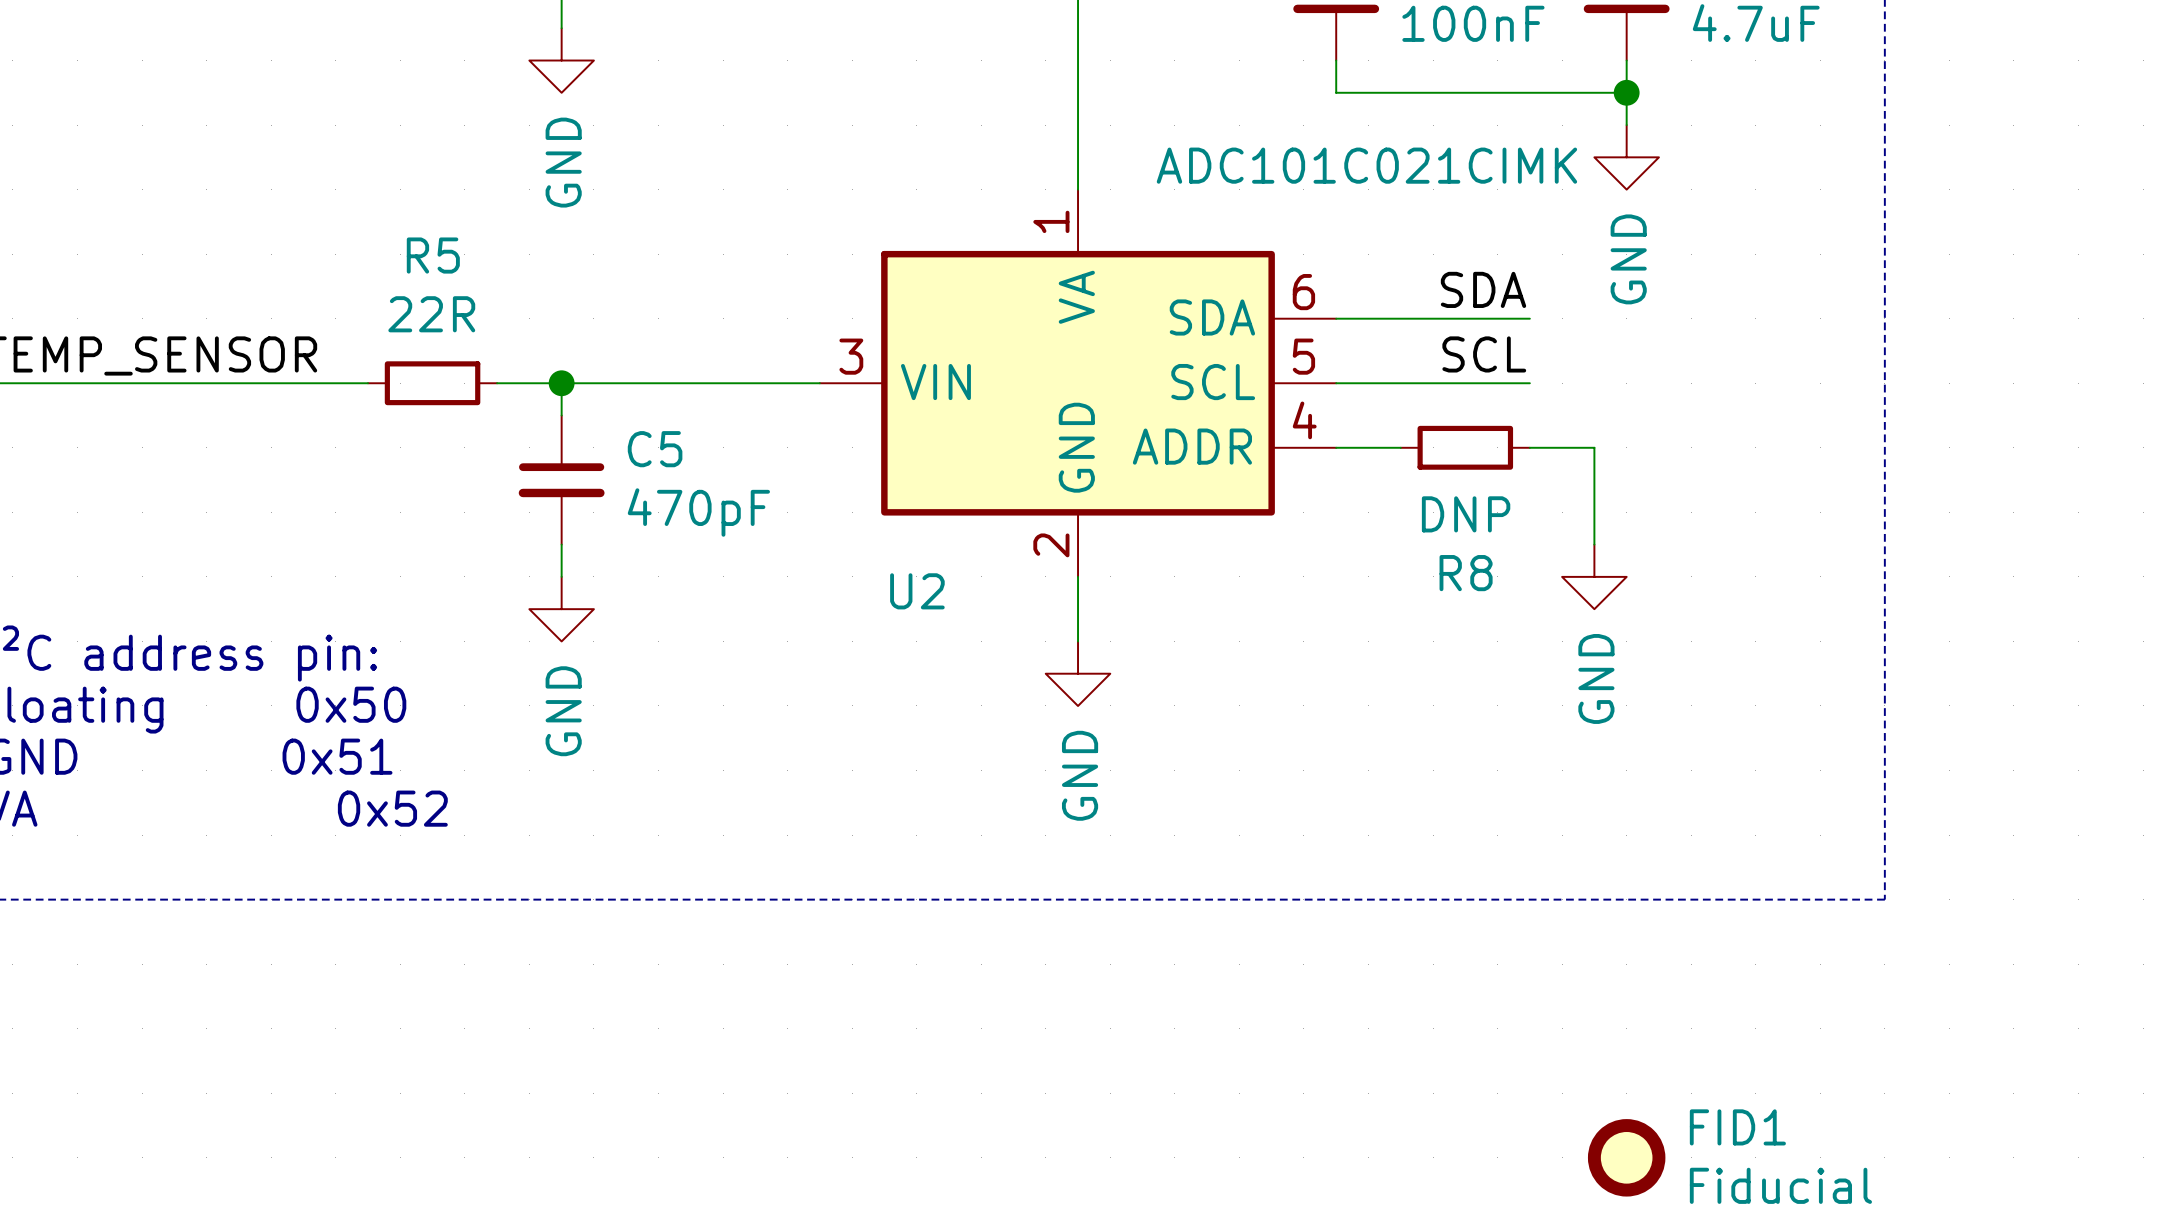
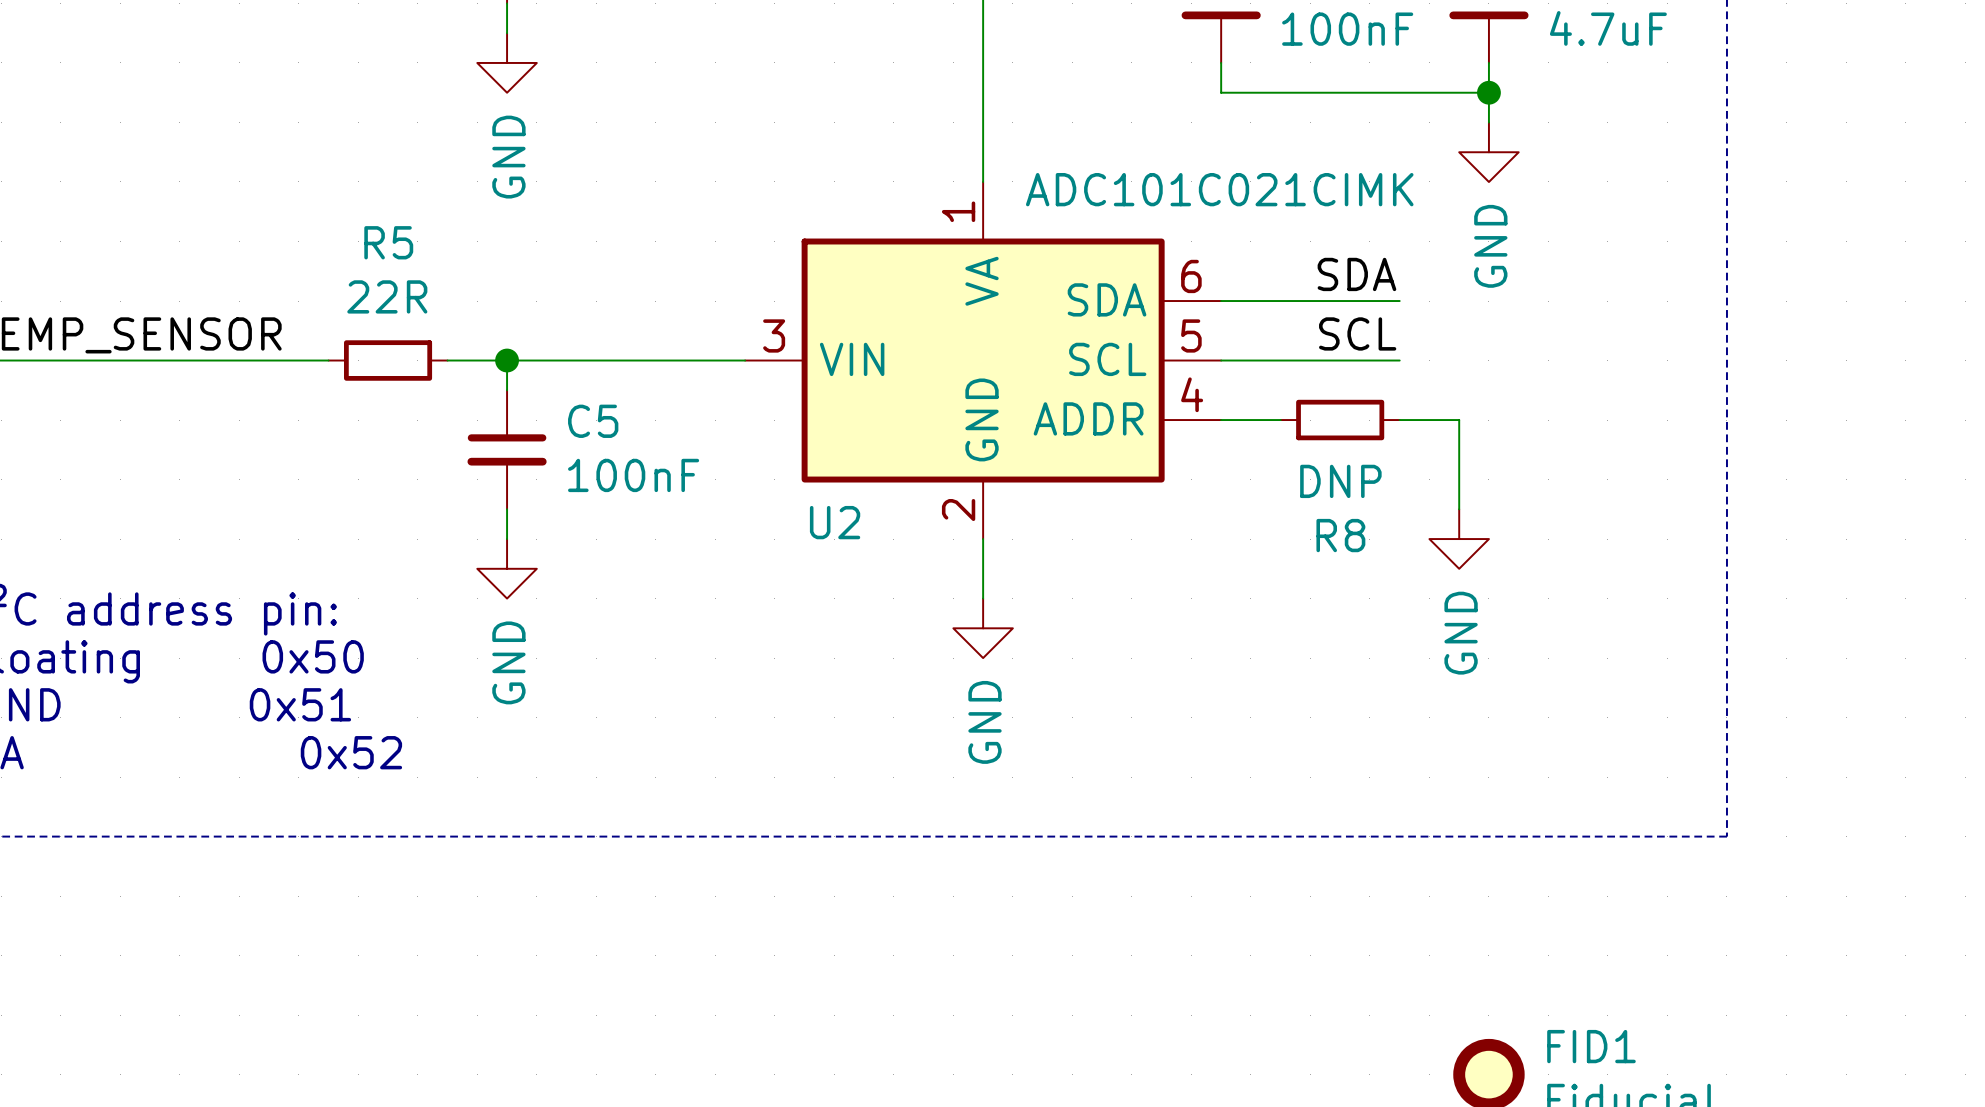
U2 value position: ADC101C021CIMK (1366, 165) -> ADC101C021CIMK (1219, 189)
C5 value: 470pF (698, 512) -> 100nF (633, 475)
U2 name position: U2 (917, 591) -> U2 (835, 522)

